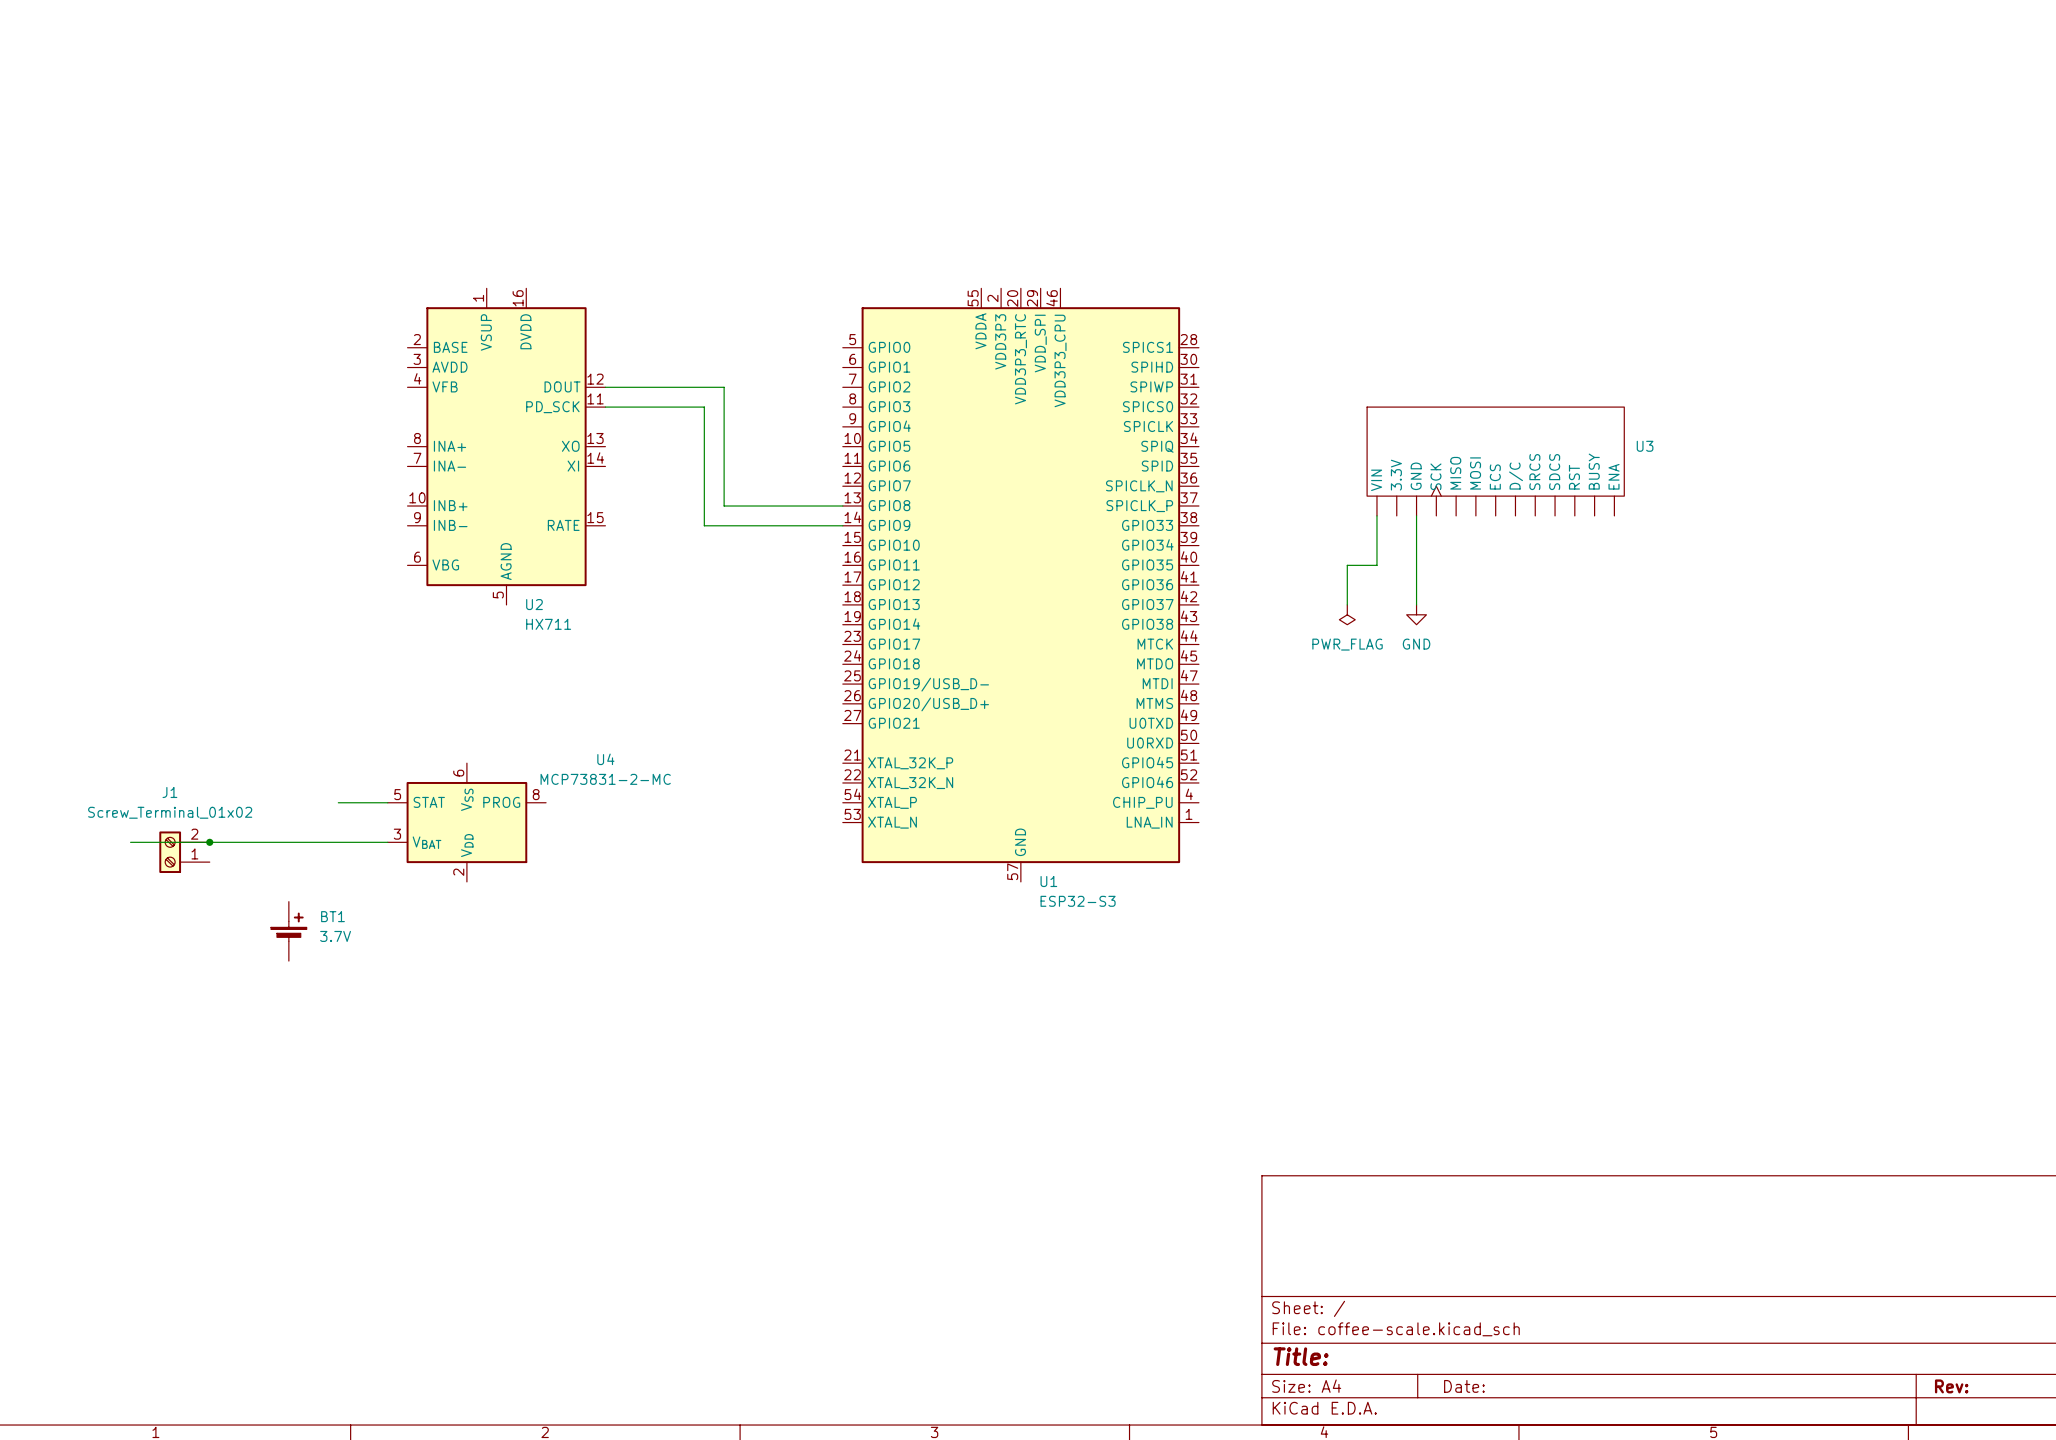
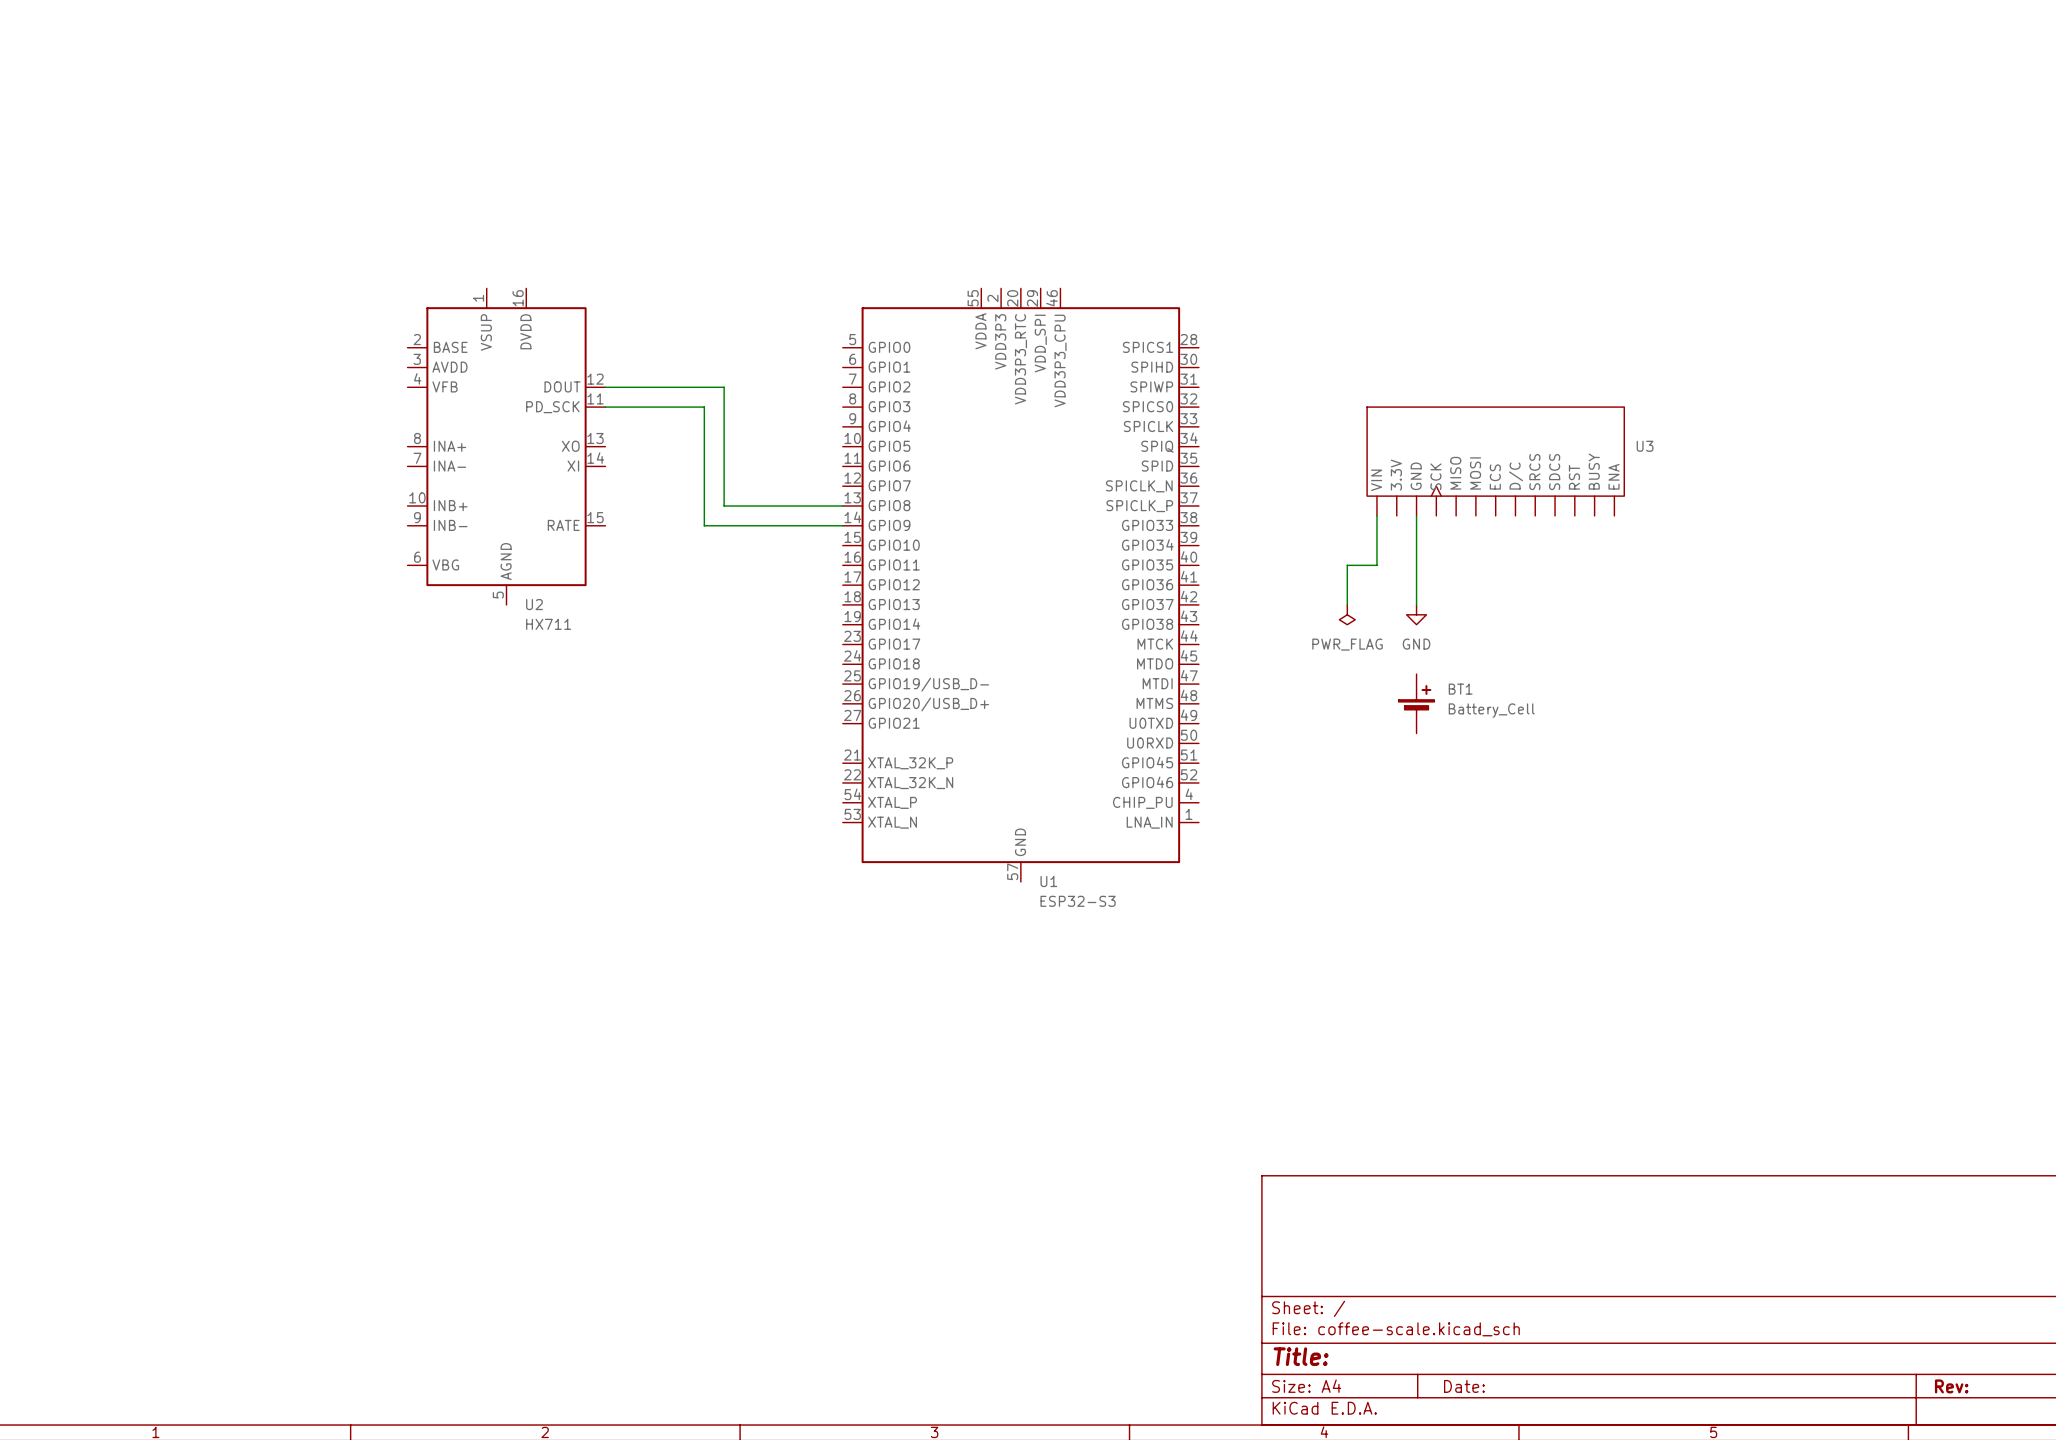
wire: (338, 802) (387, 802) -> none
U4: MCP73831-2-MC (466, 822) -> none
wire: (130, 842) (387, 842) -> none
junction: (209, 842) -> none
J1: Screw_Terminal_01x02 (184, 852) -> none
BT1 position: (288, 931) -> (1416, 703)
BT1 value: 3.7V (335, 936) -> Battery_Cell (1491, 710)

